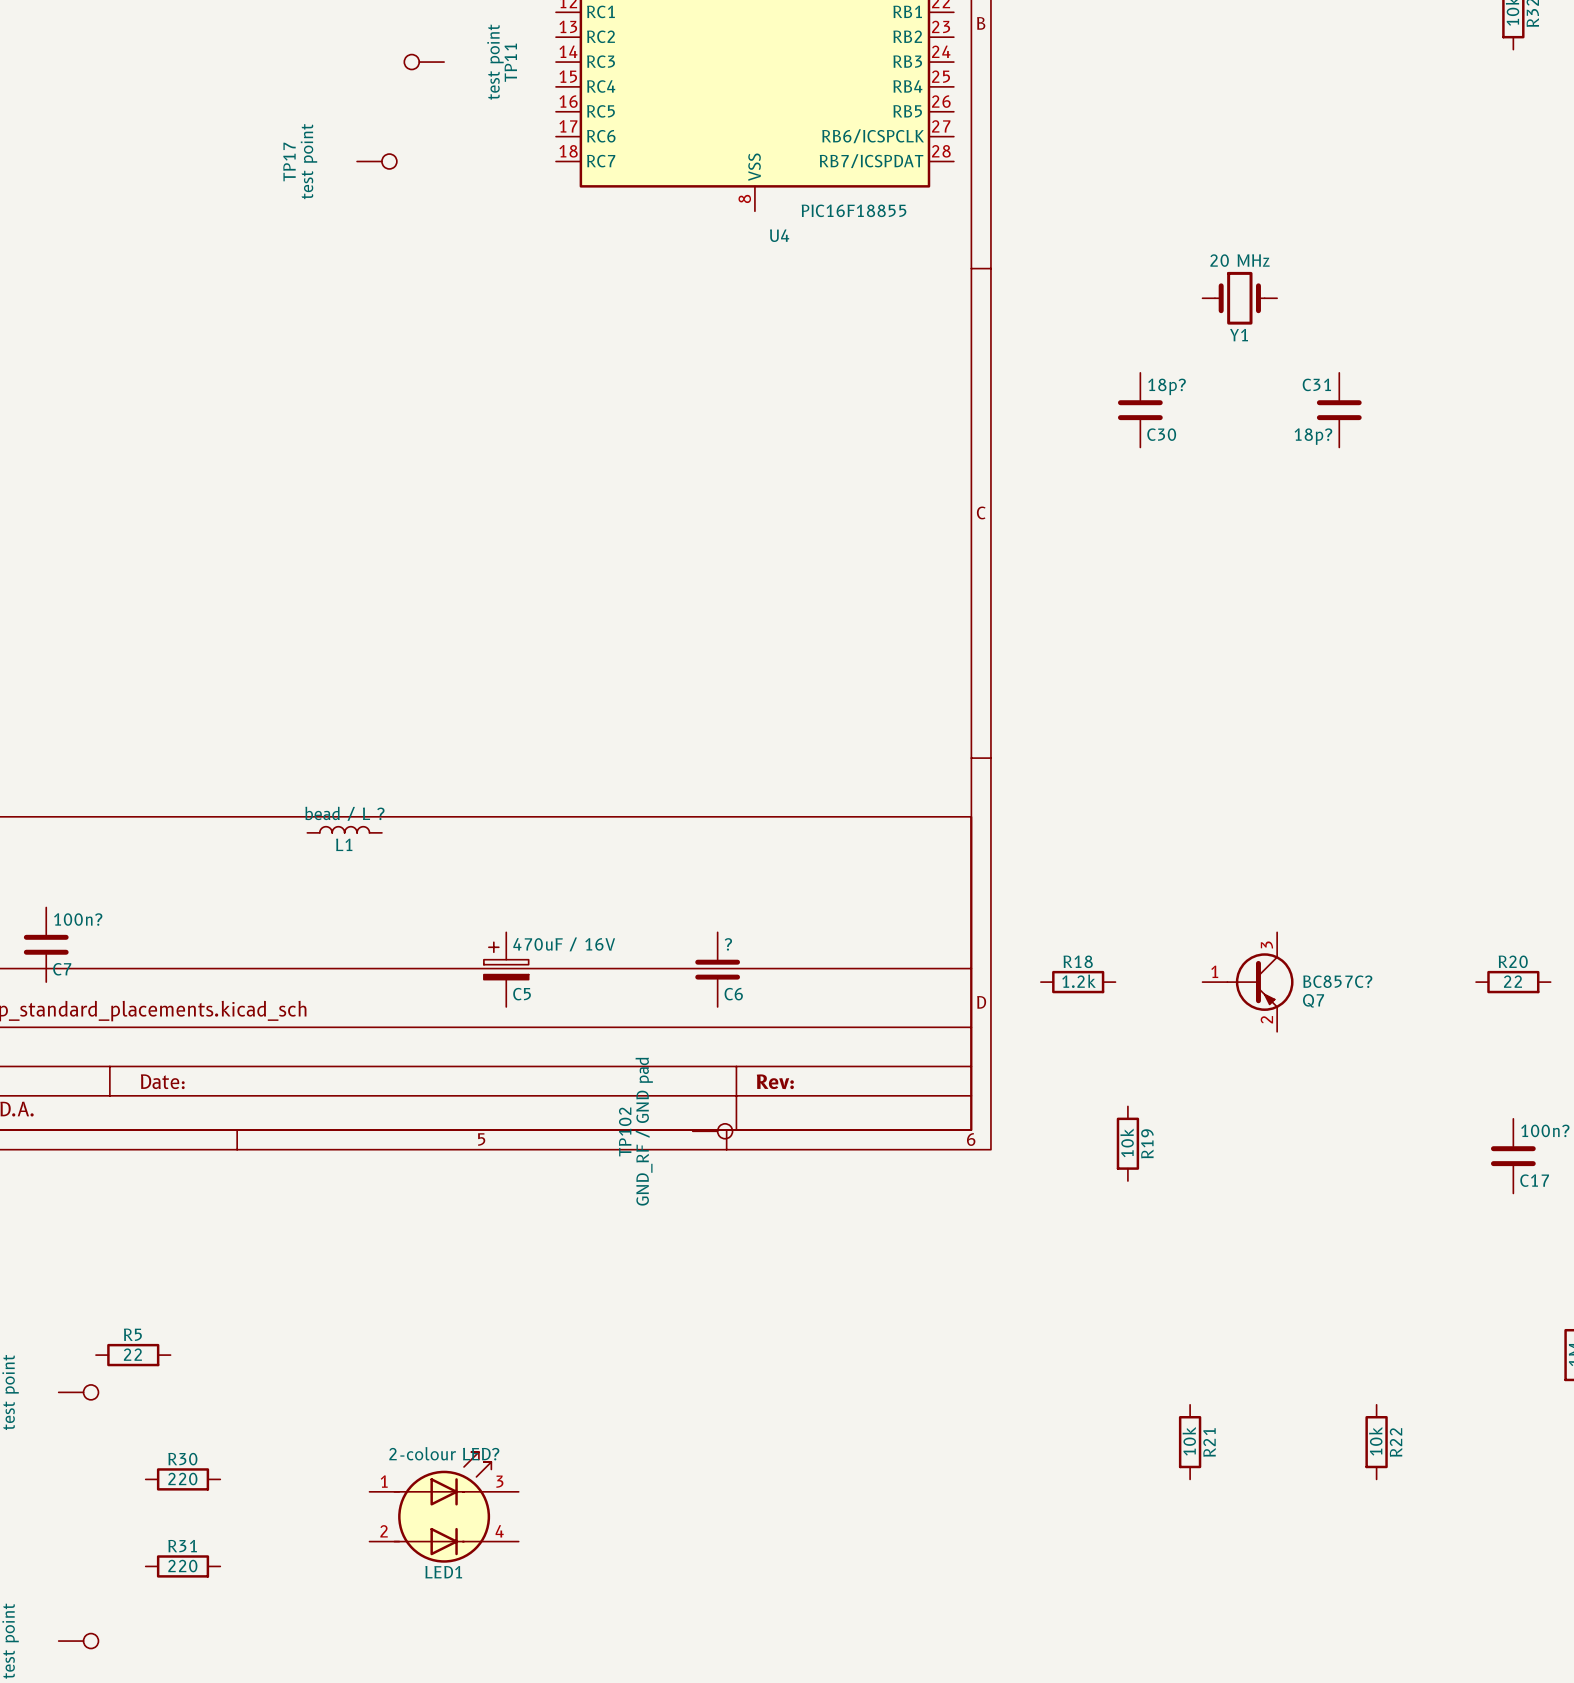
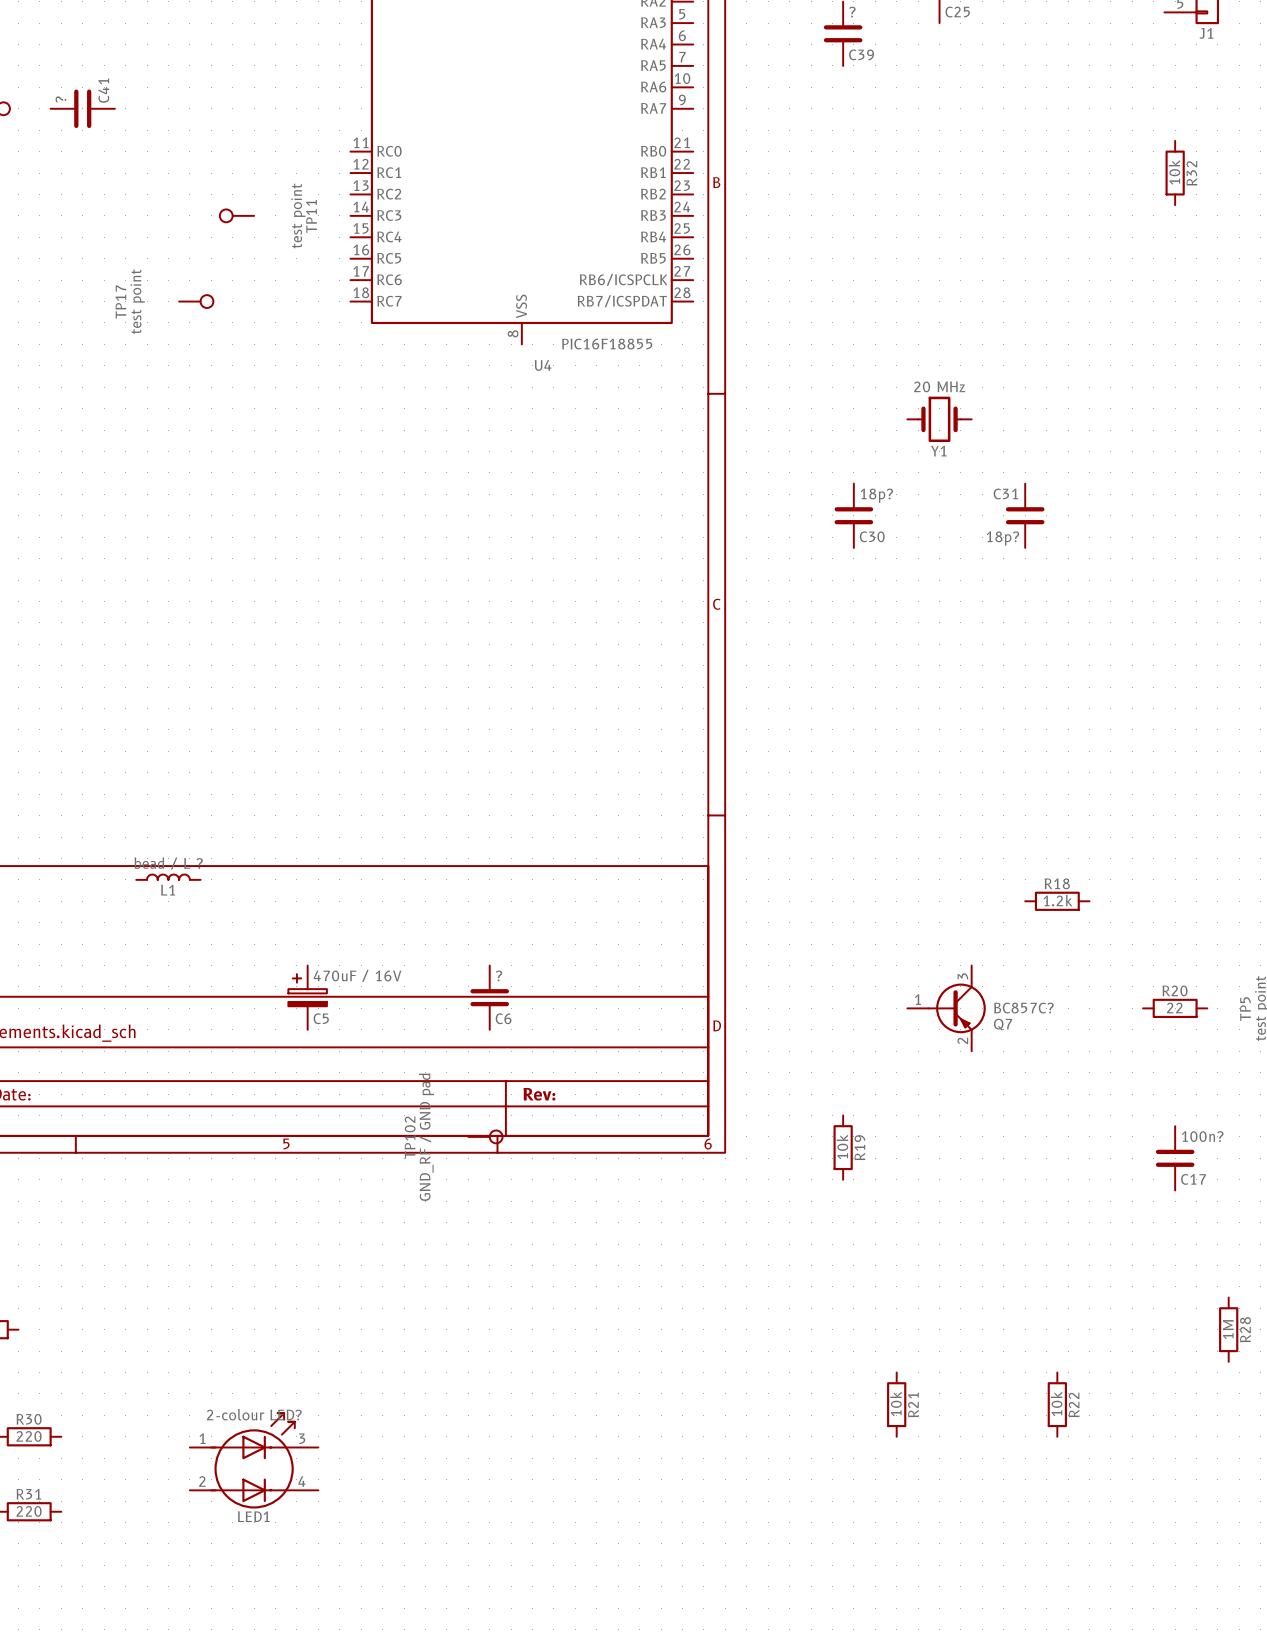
R18 position: (1078, 982) -> (1057, 901)

